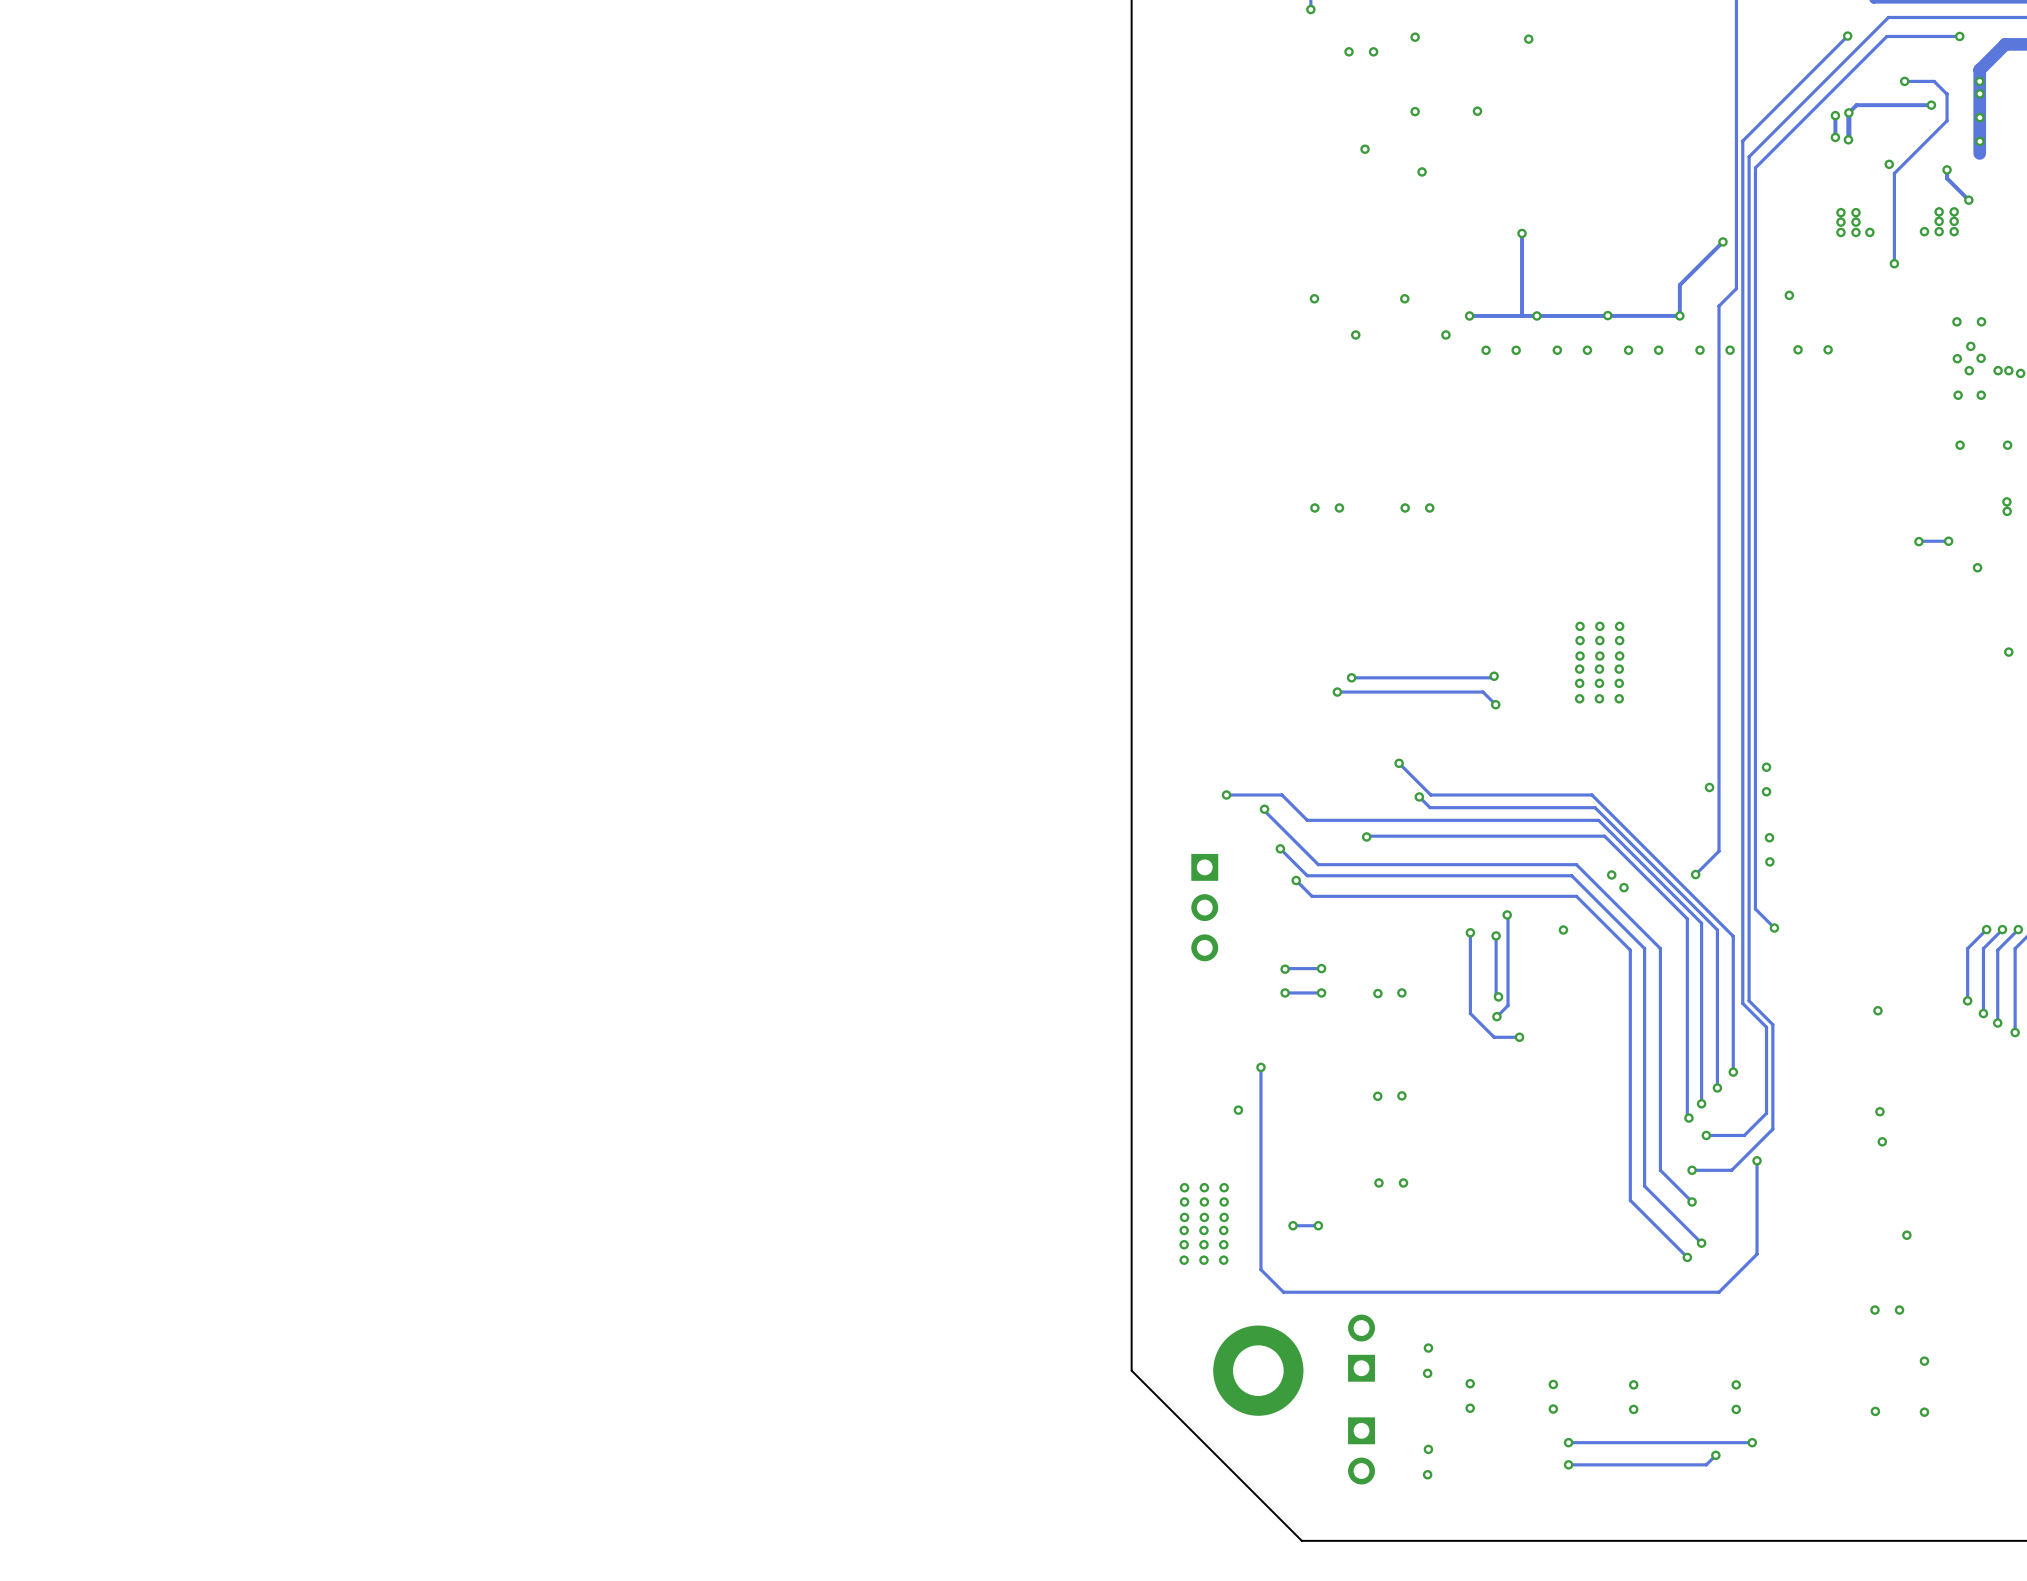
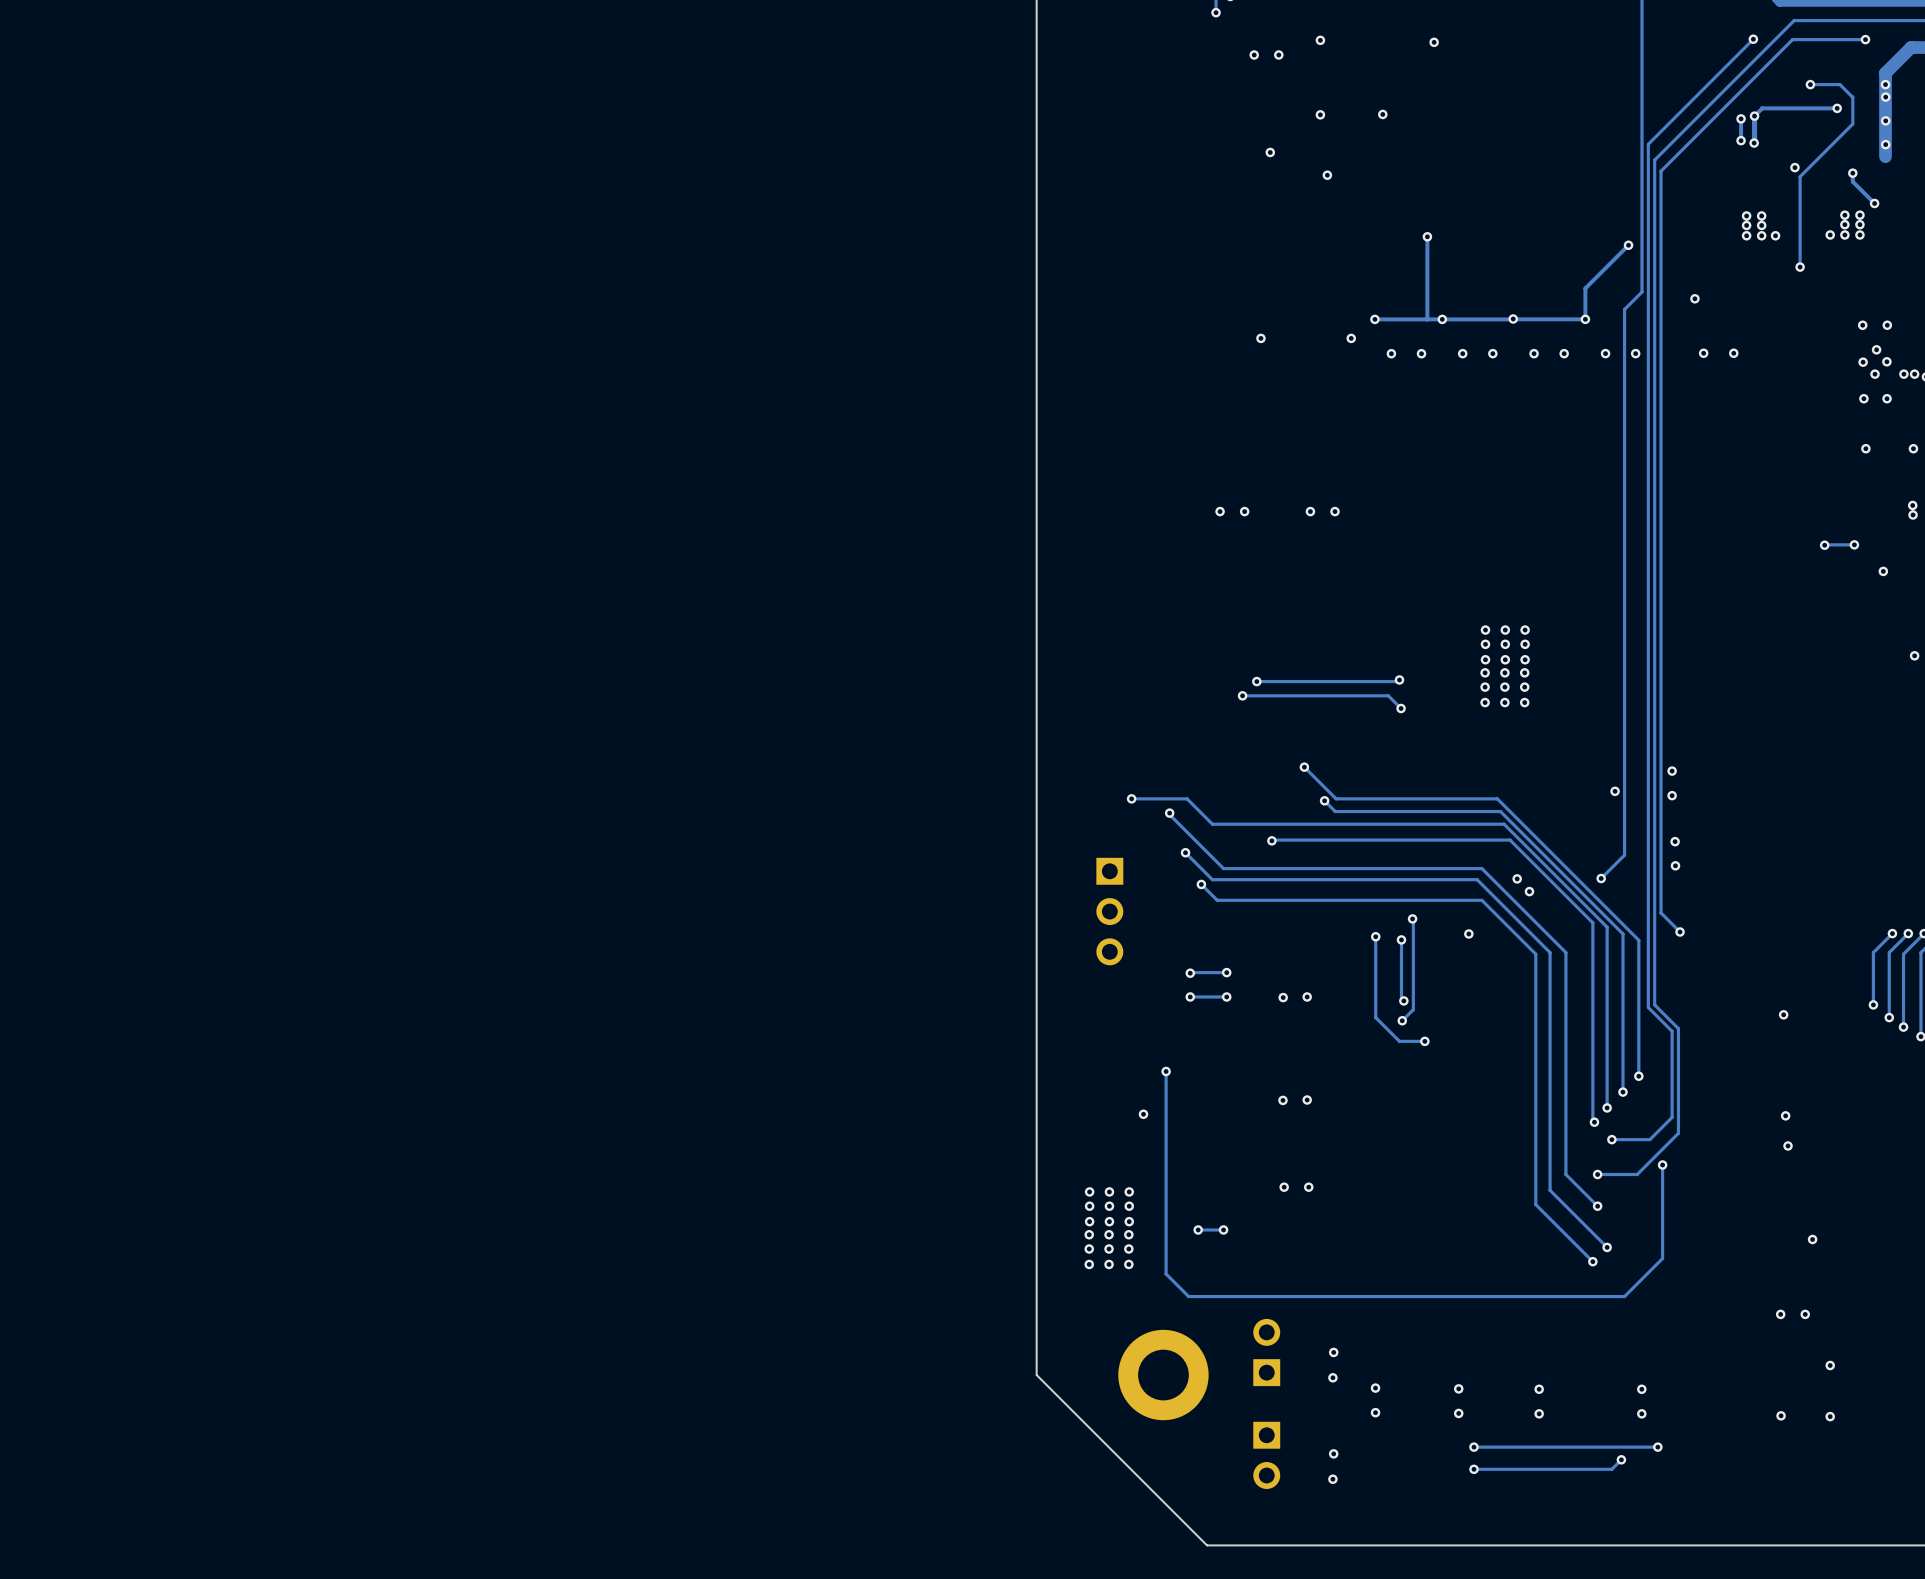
via: (1314, 298) -> none
via: (1404, 298) -> none

